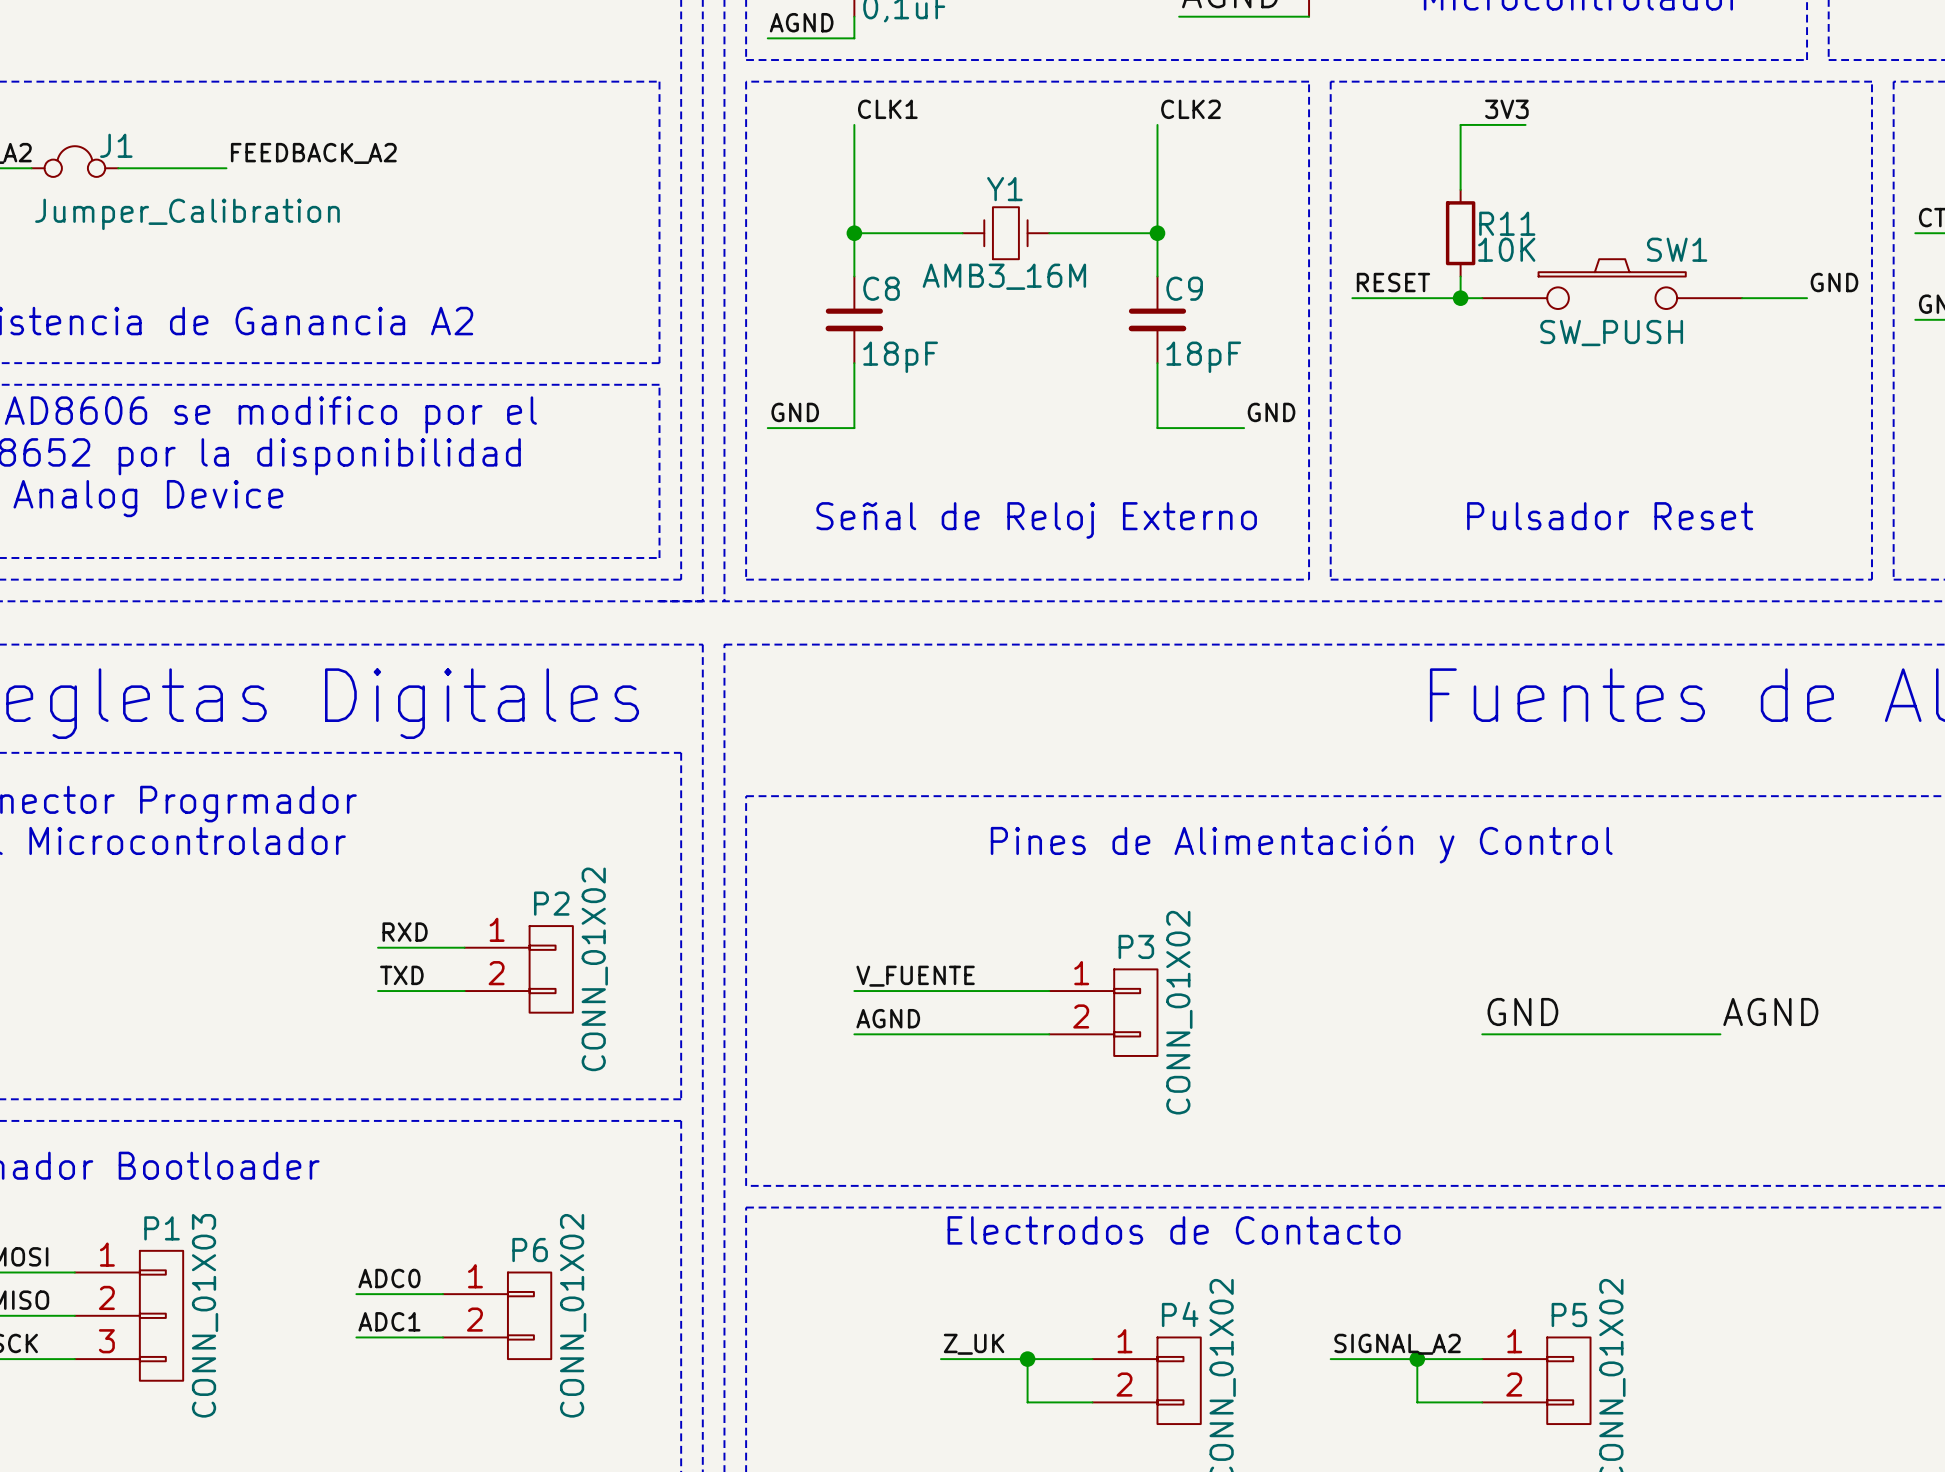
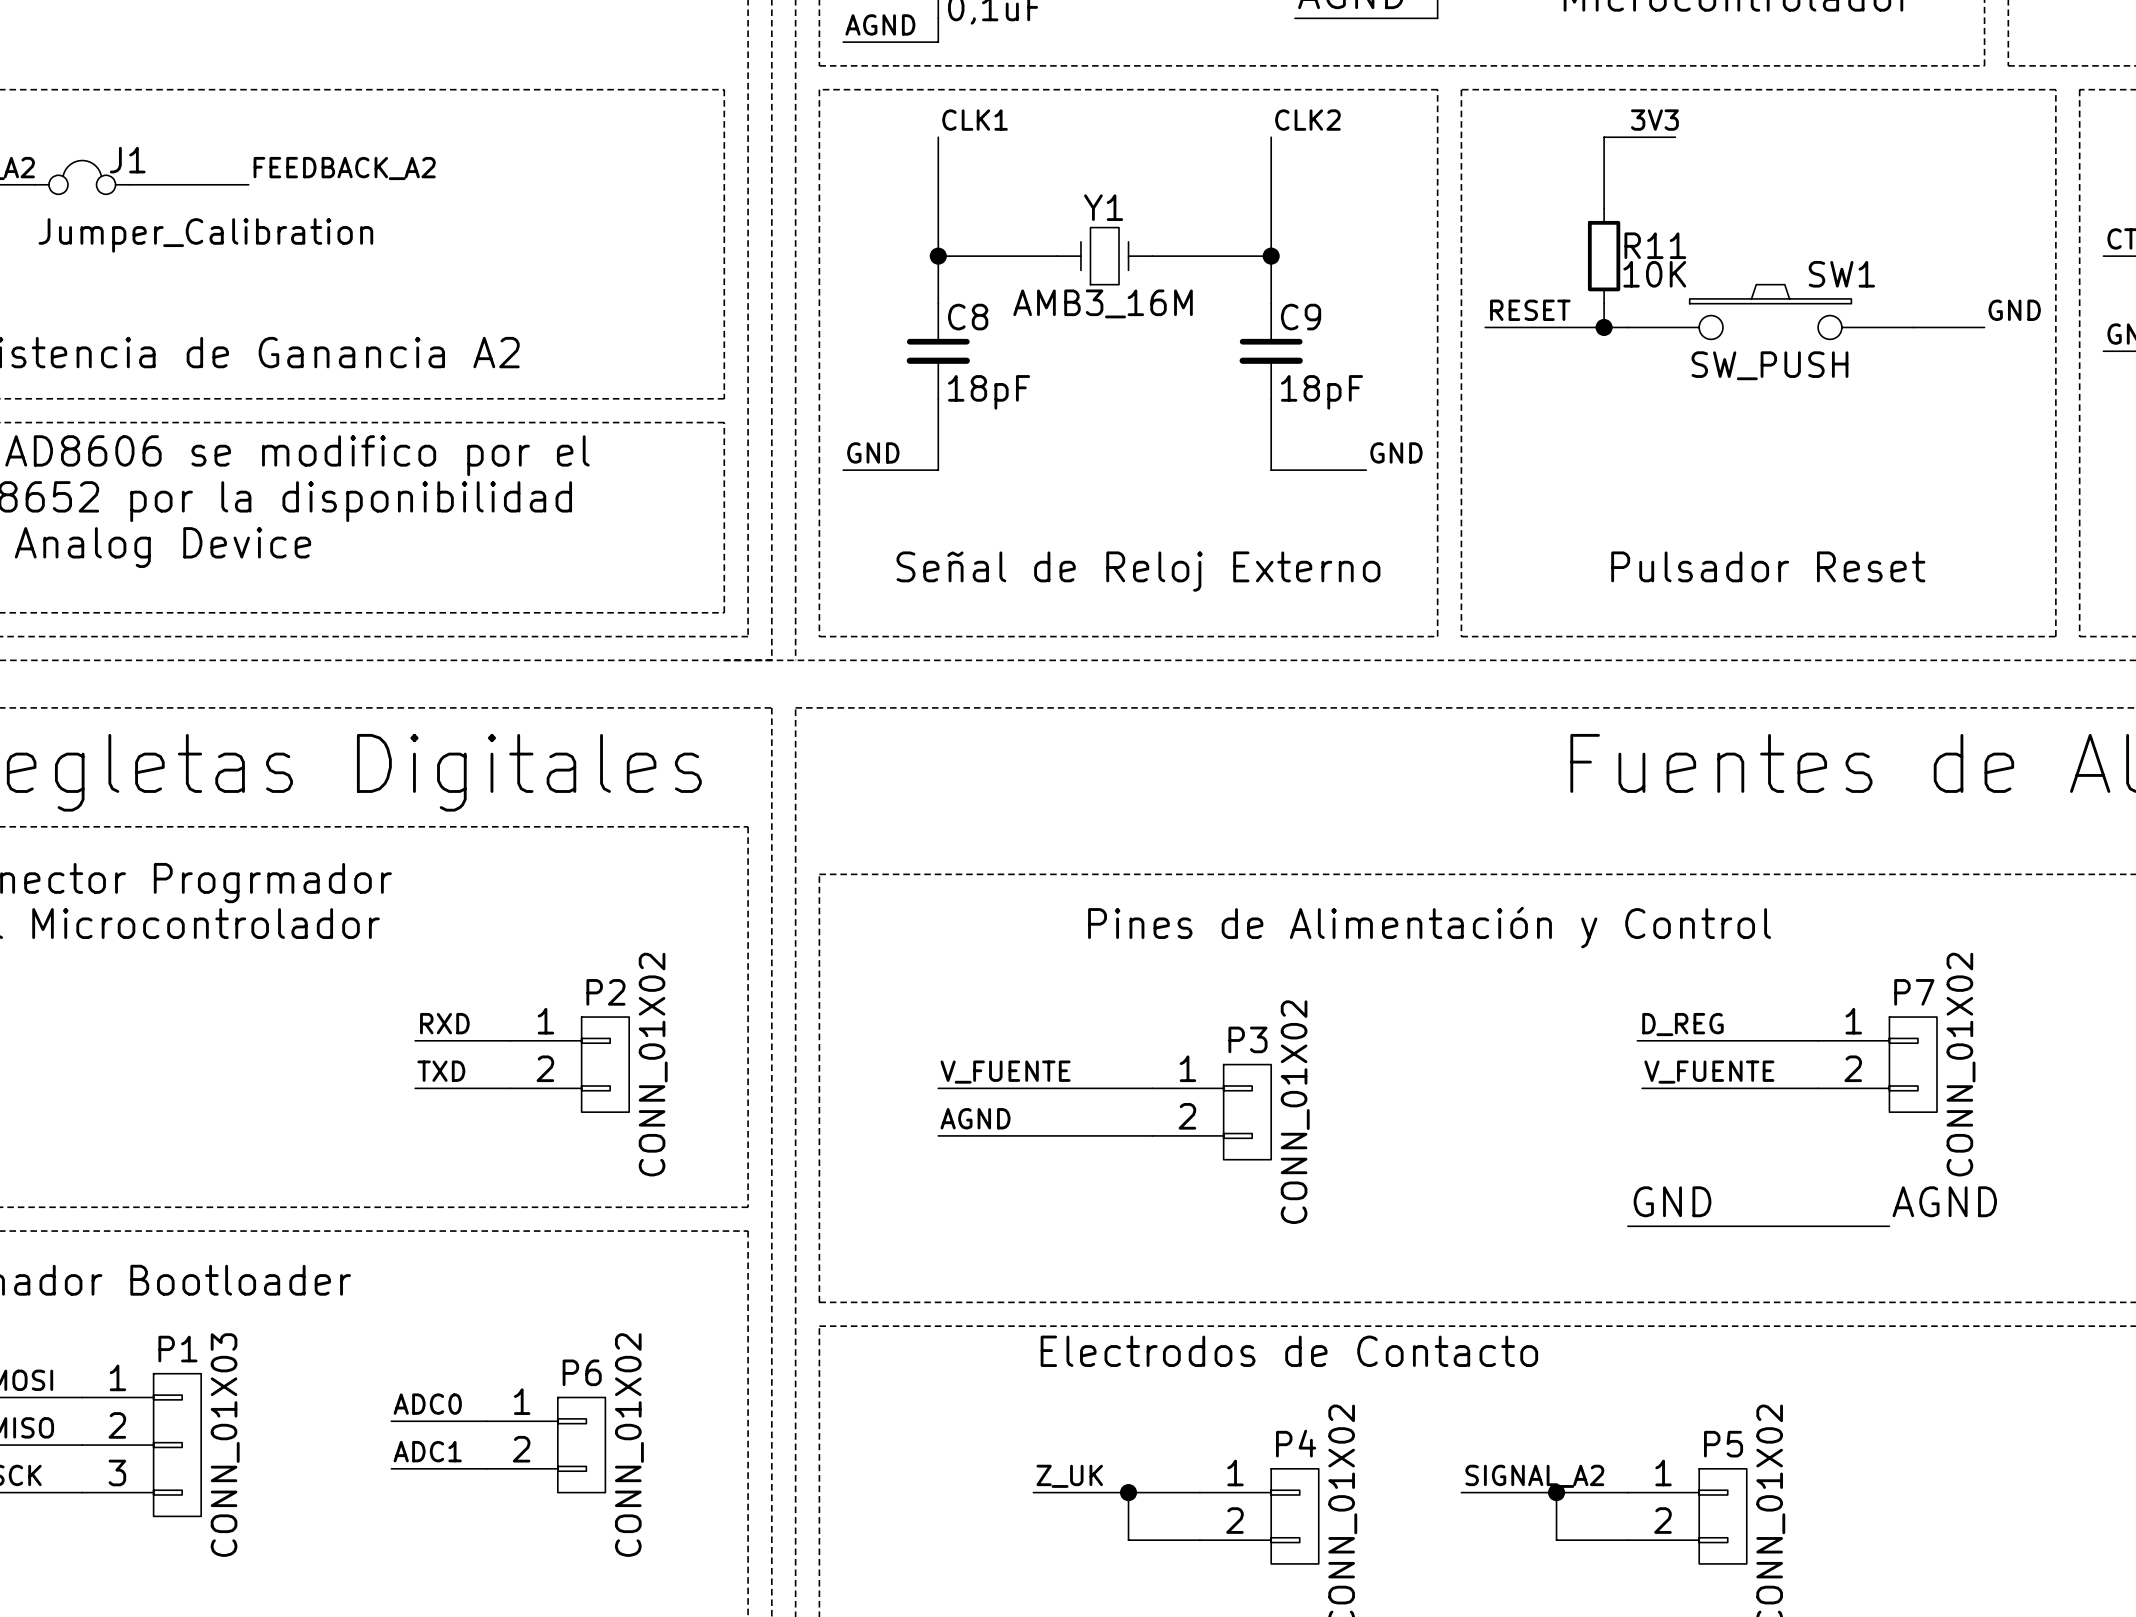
label: none -> D_REG (1682, 1024)
wire: none -> (1637, 1040) (1818, 1040)
P7: none -> CONN_01X02 (1877, 1064)
label: none -> V_FUENTE (1709, 1072)
wire: none -> (1642, 1088) (1818, 1088)
label position: GND (1522, 1011) -> GND (1672, 1201)
label position: AGND (1770, 1011) -> AGND (1944, 1201)
wire: (1482, 1034) (1720, 1034) -> (1627, 1226) (1889, 1226)

